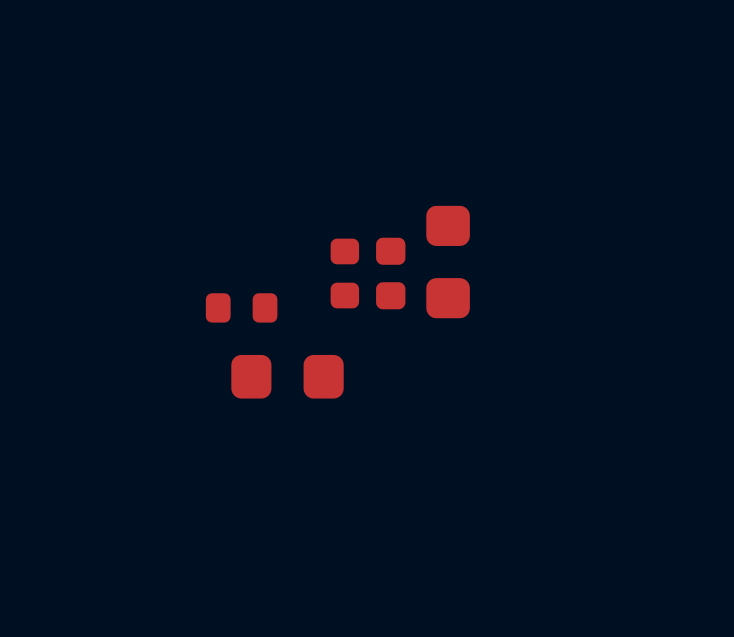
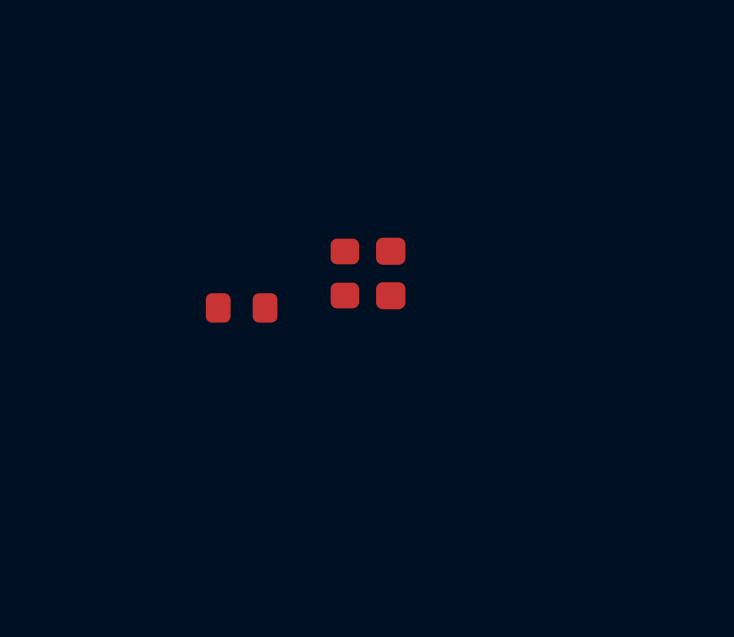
part: (448, 262) -> none
part: (287, 376) -> none

